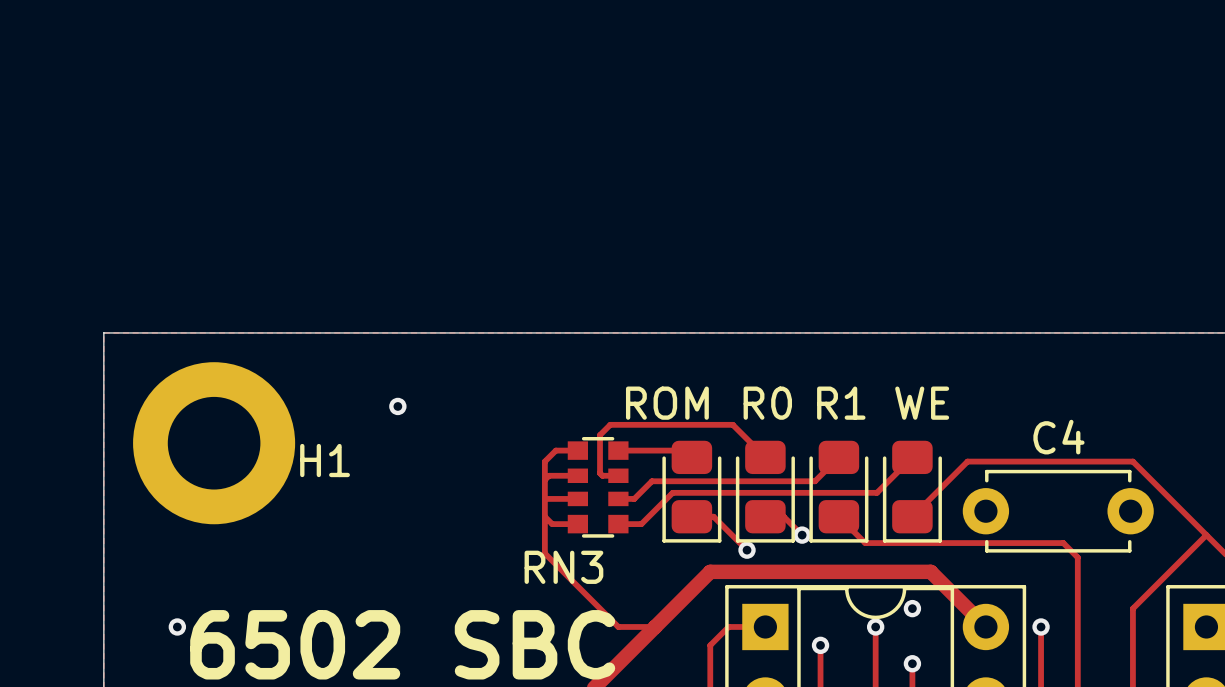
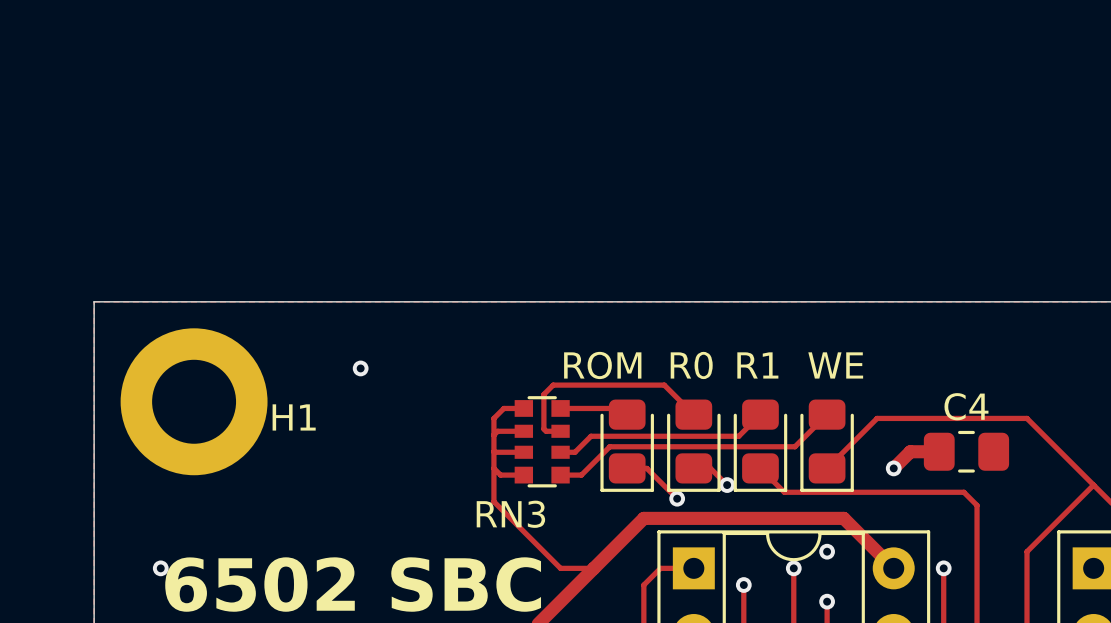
C4 footprint: [962, 469, 1154, 553] -> [923, 430, 1010, 473]
track: none -> (939, 451) (910, 451) (893, 468)
via: none -> (893, 468)

